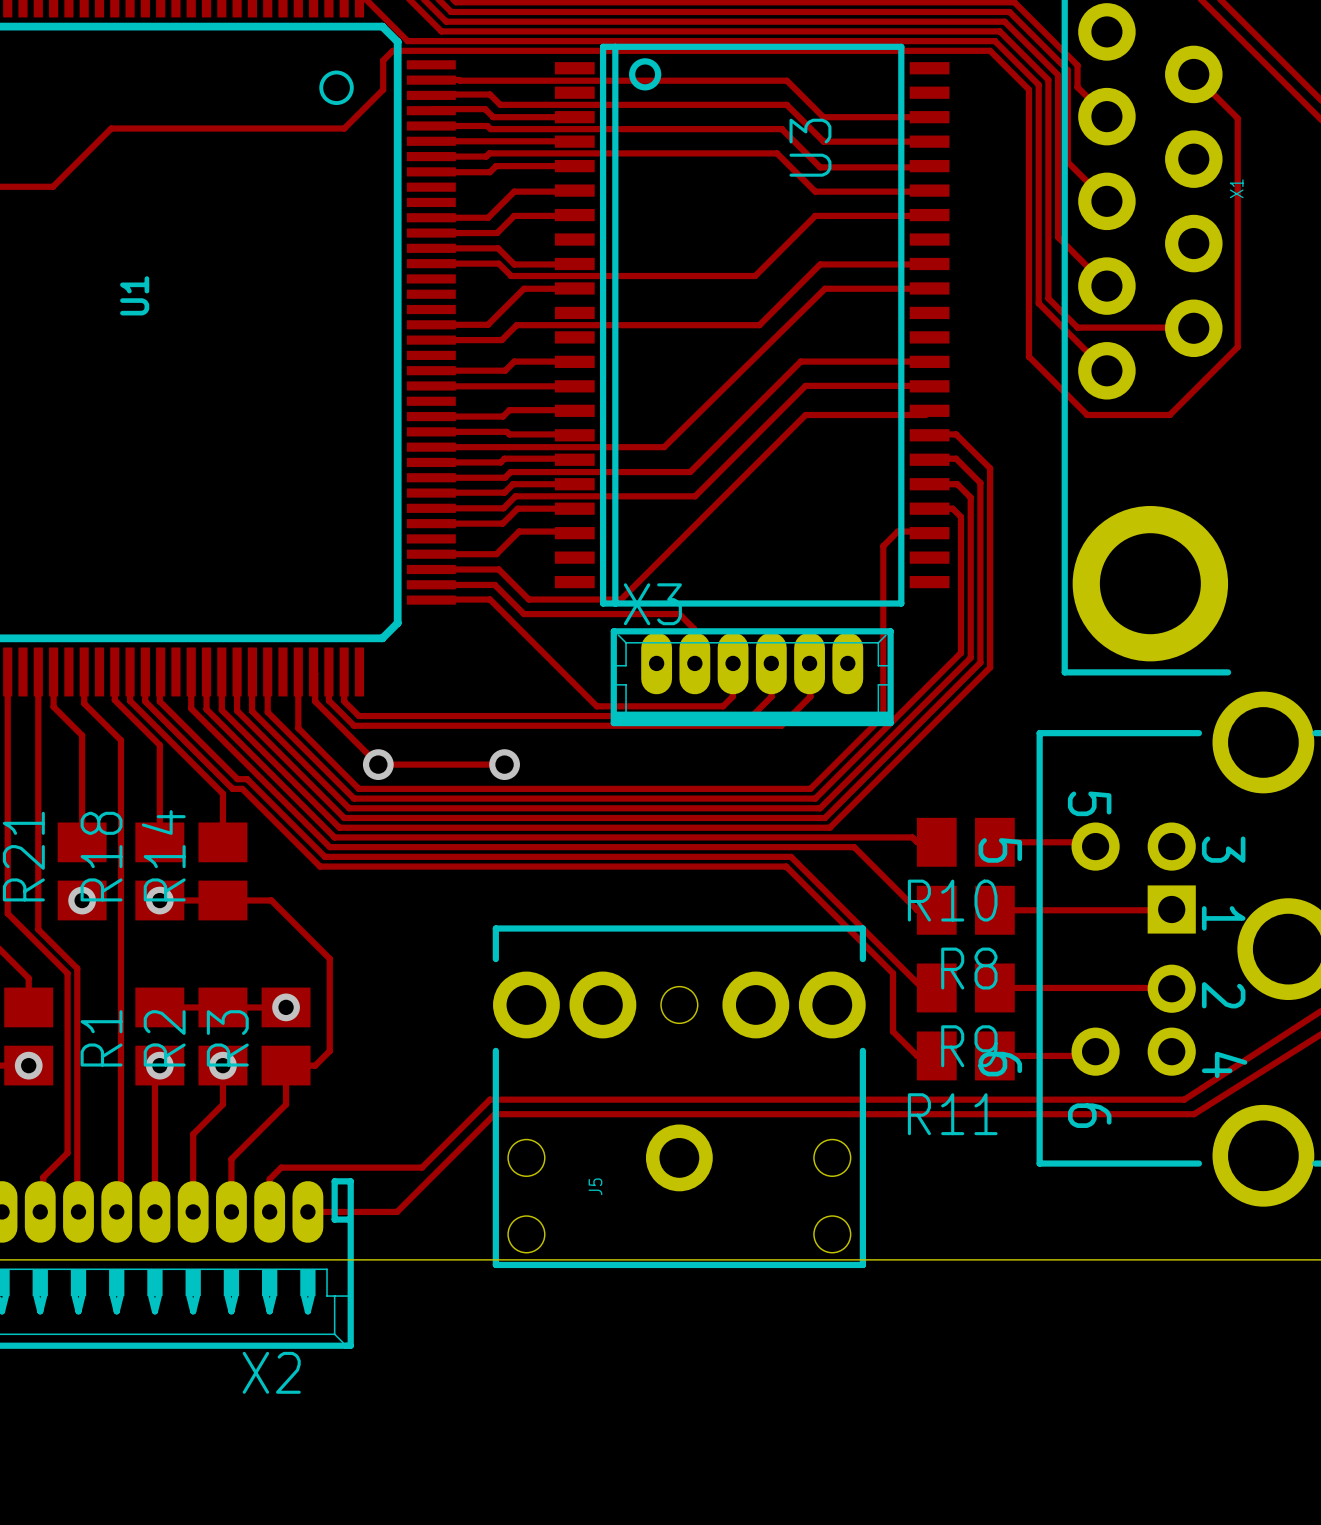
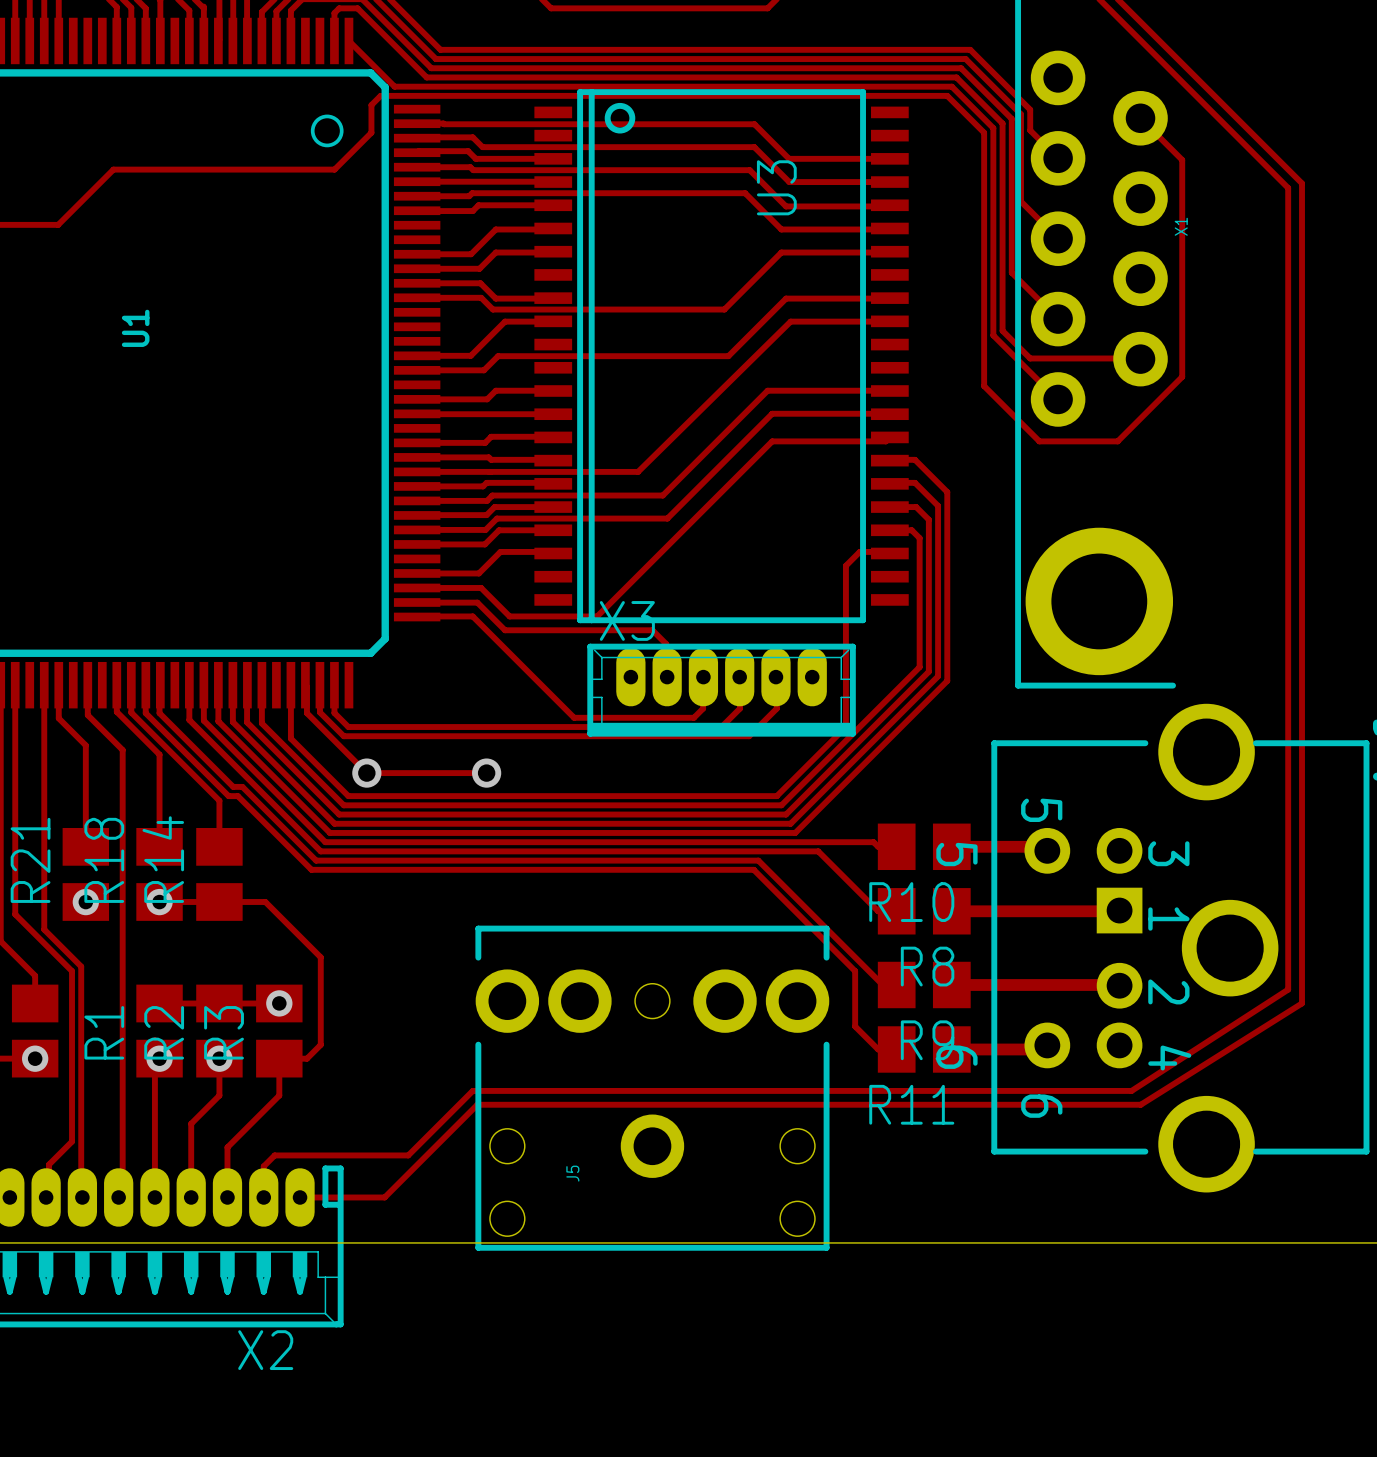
track width: thin (994, 842) (1091, 842) -> thick (951, 846) (1043, 846)
track width: thin (994, 910) (1171, 910) -> thick (951, 911) (1118, 911)
track width: thin (994, 987) (1171, 987) -> thick (951, 984) (1118, 984)
track width: thin (994, 1055) (1091, 1055) -> thick (951, 1049) (1043, 1049)

